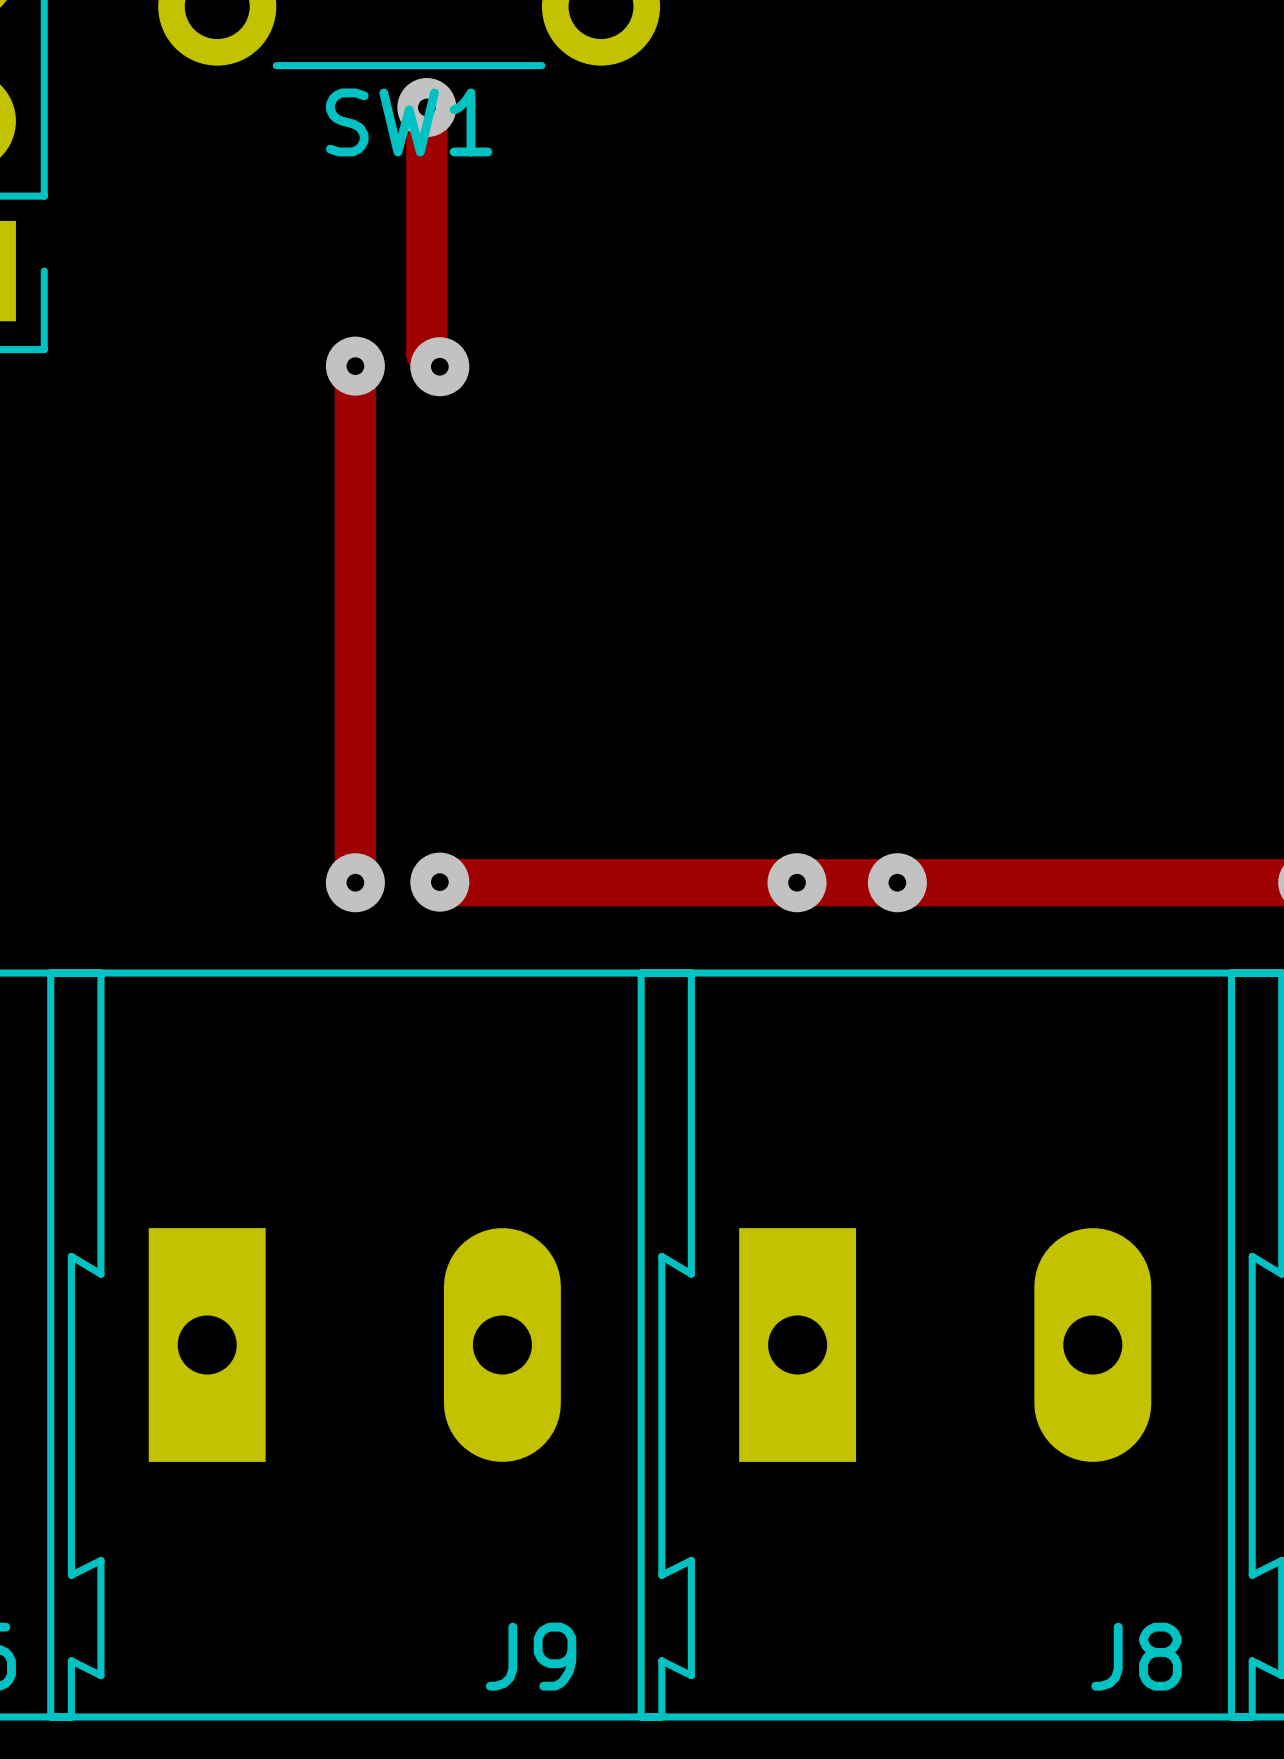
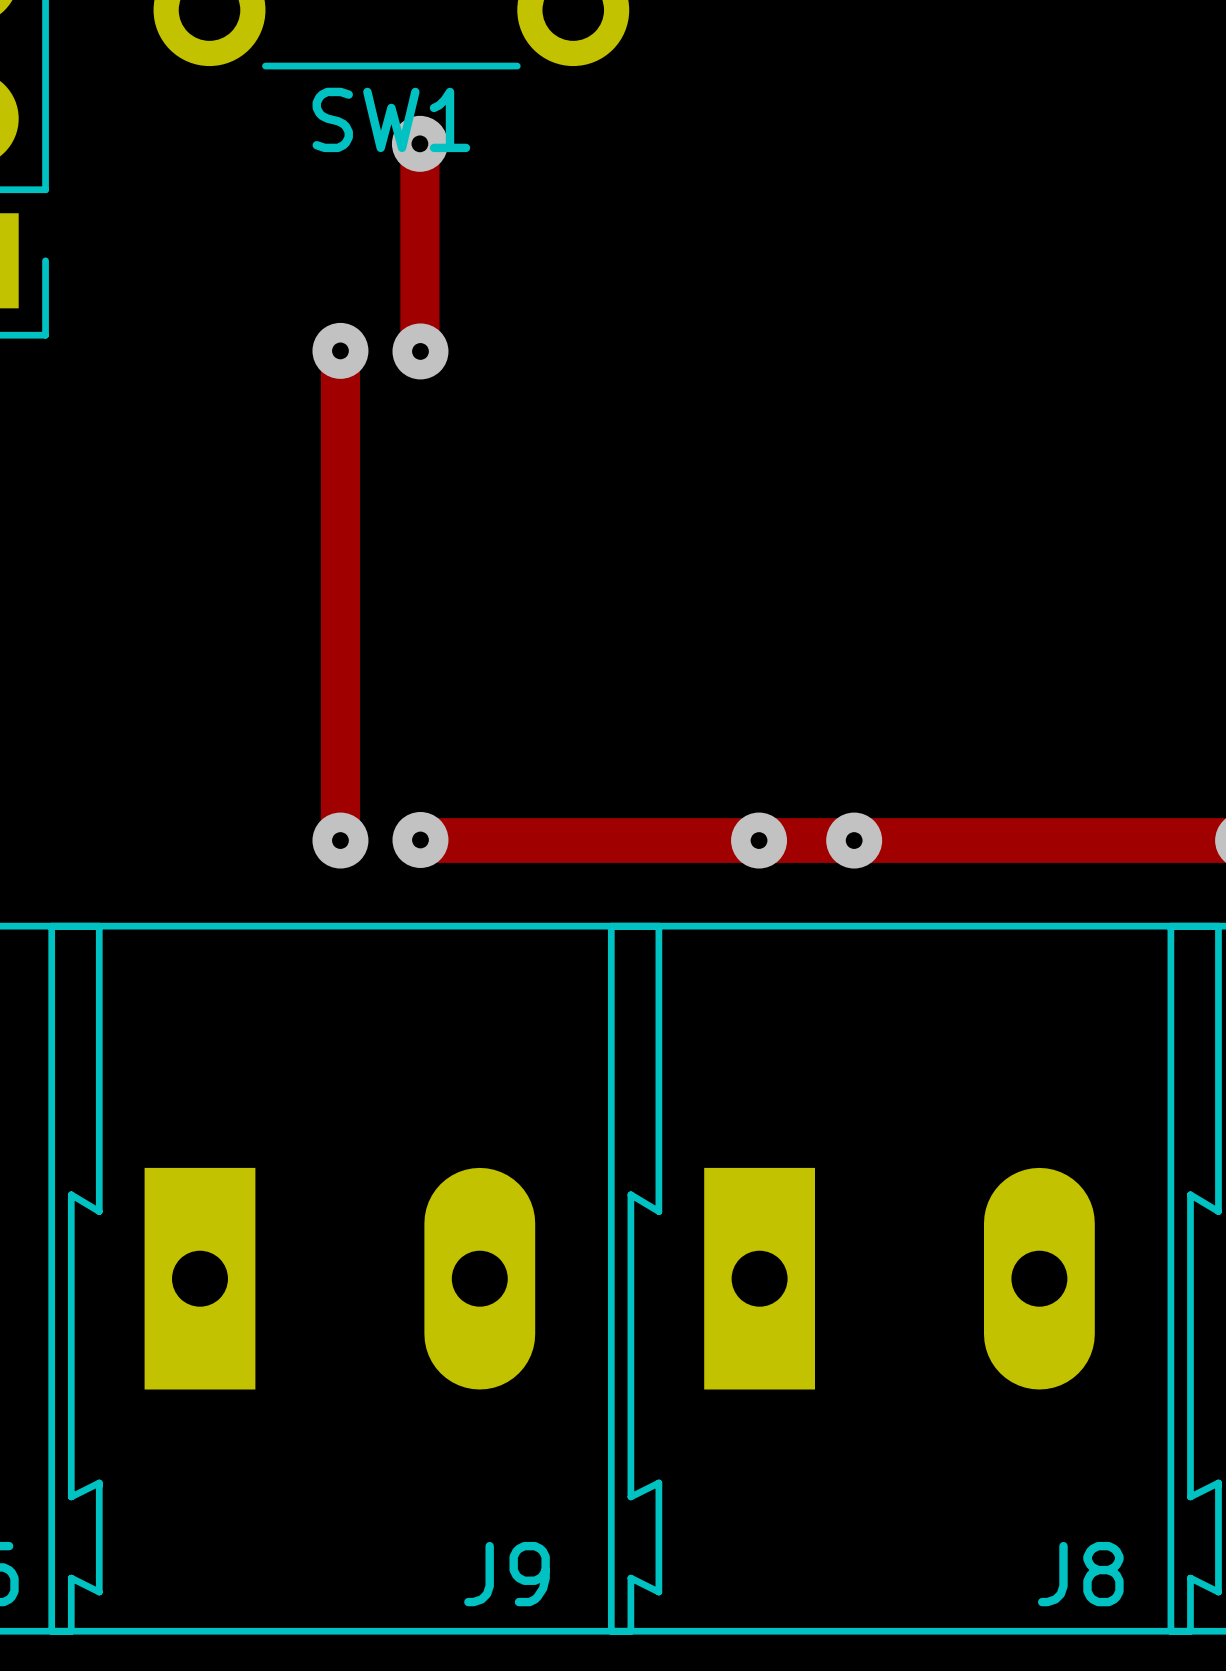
track: (426, 107) (426, 353) (439, 366) -> (419, 143) (419, 350)
via position: (426, 107) -> (419, 143)

